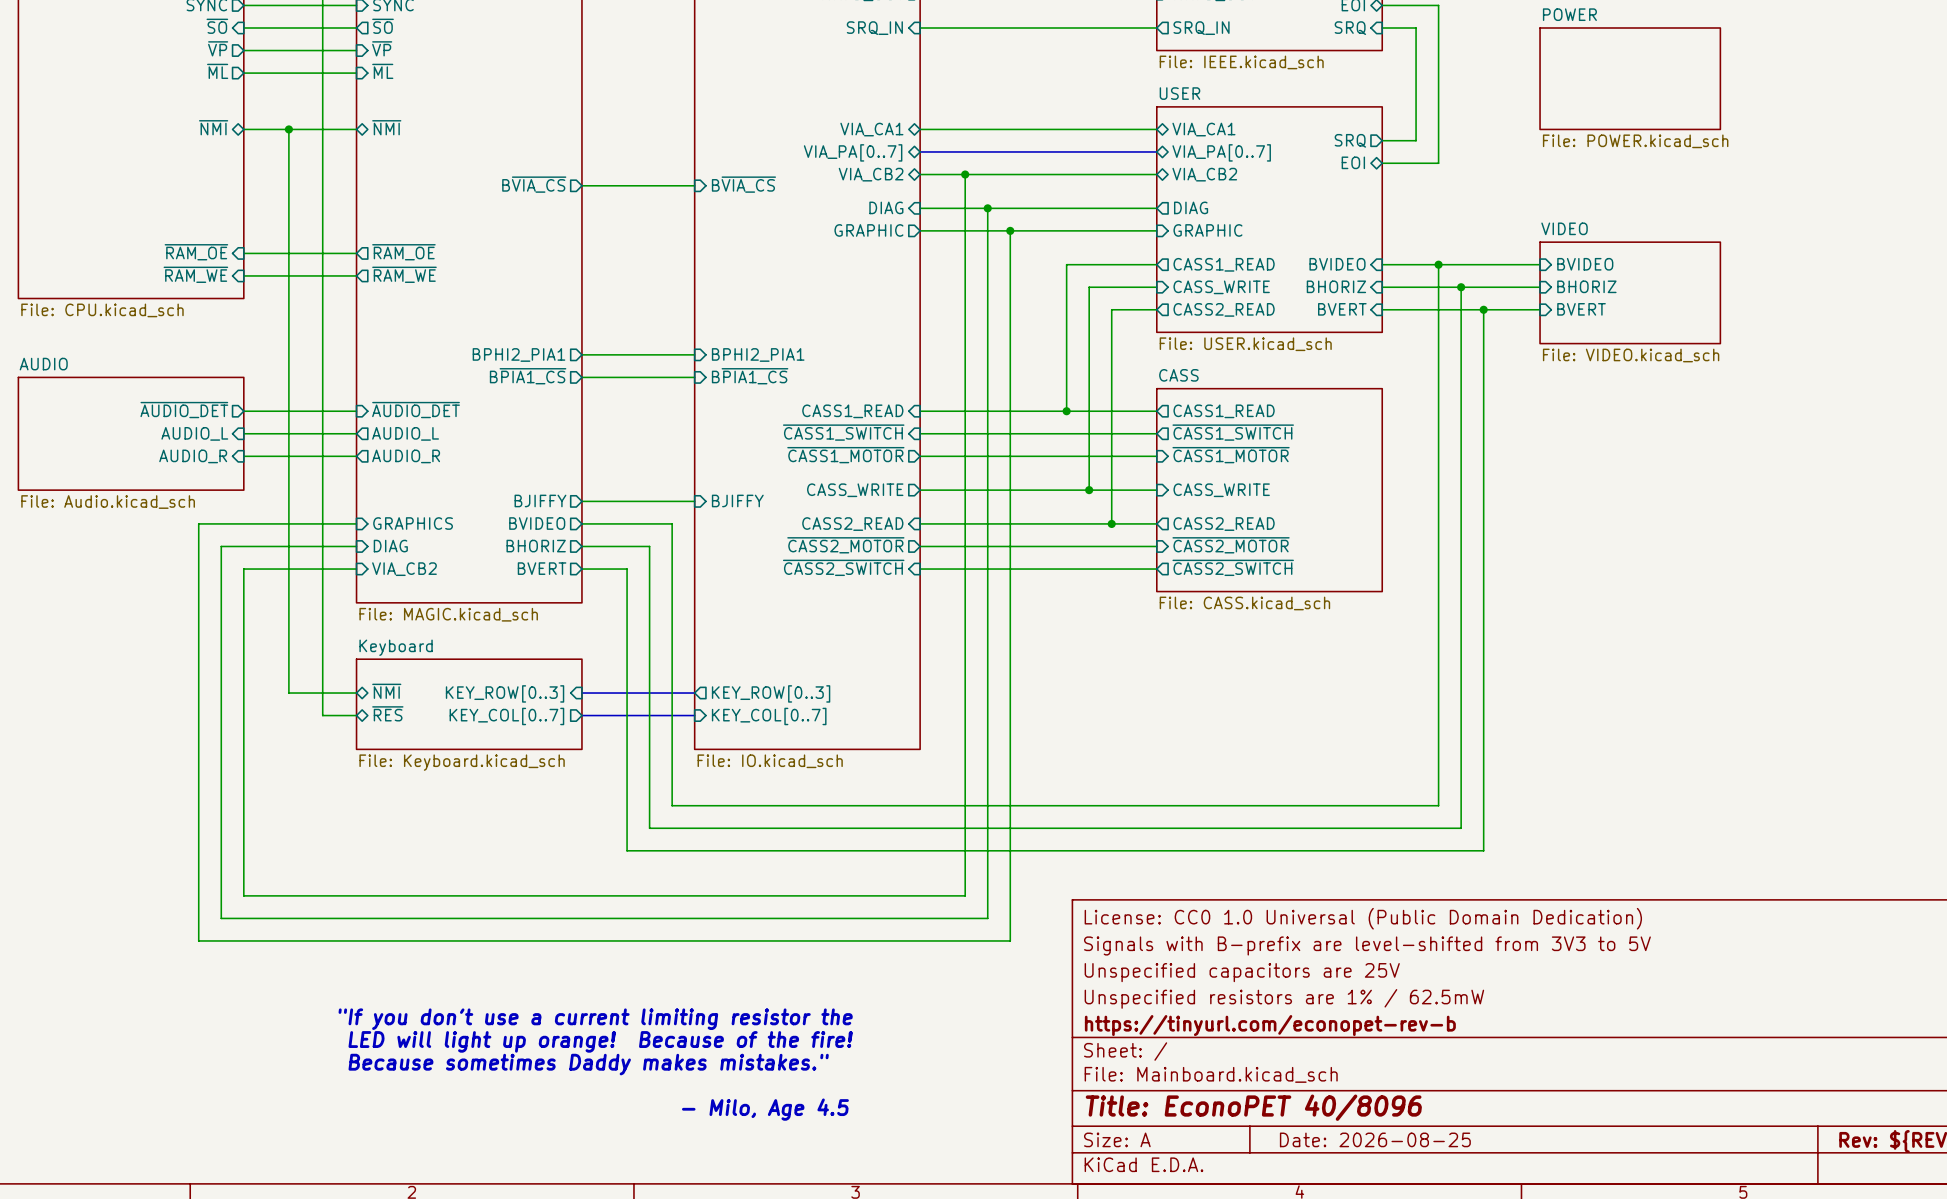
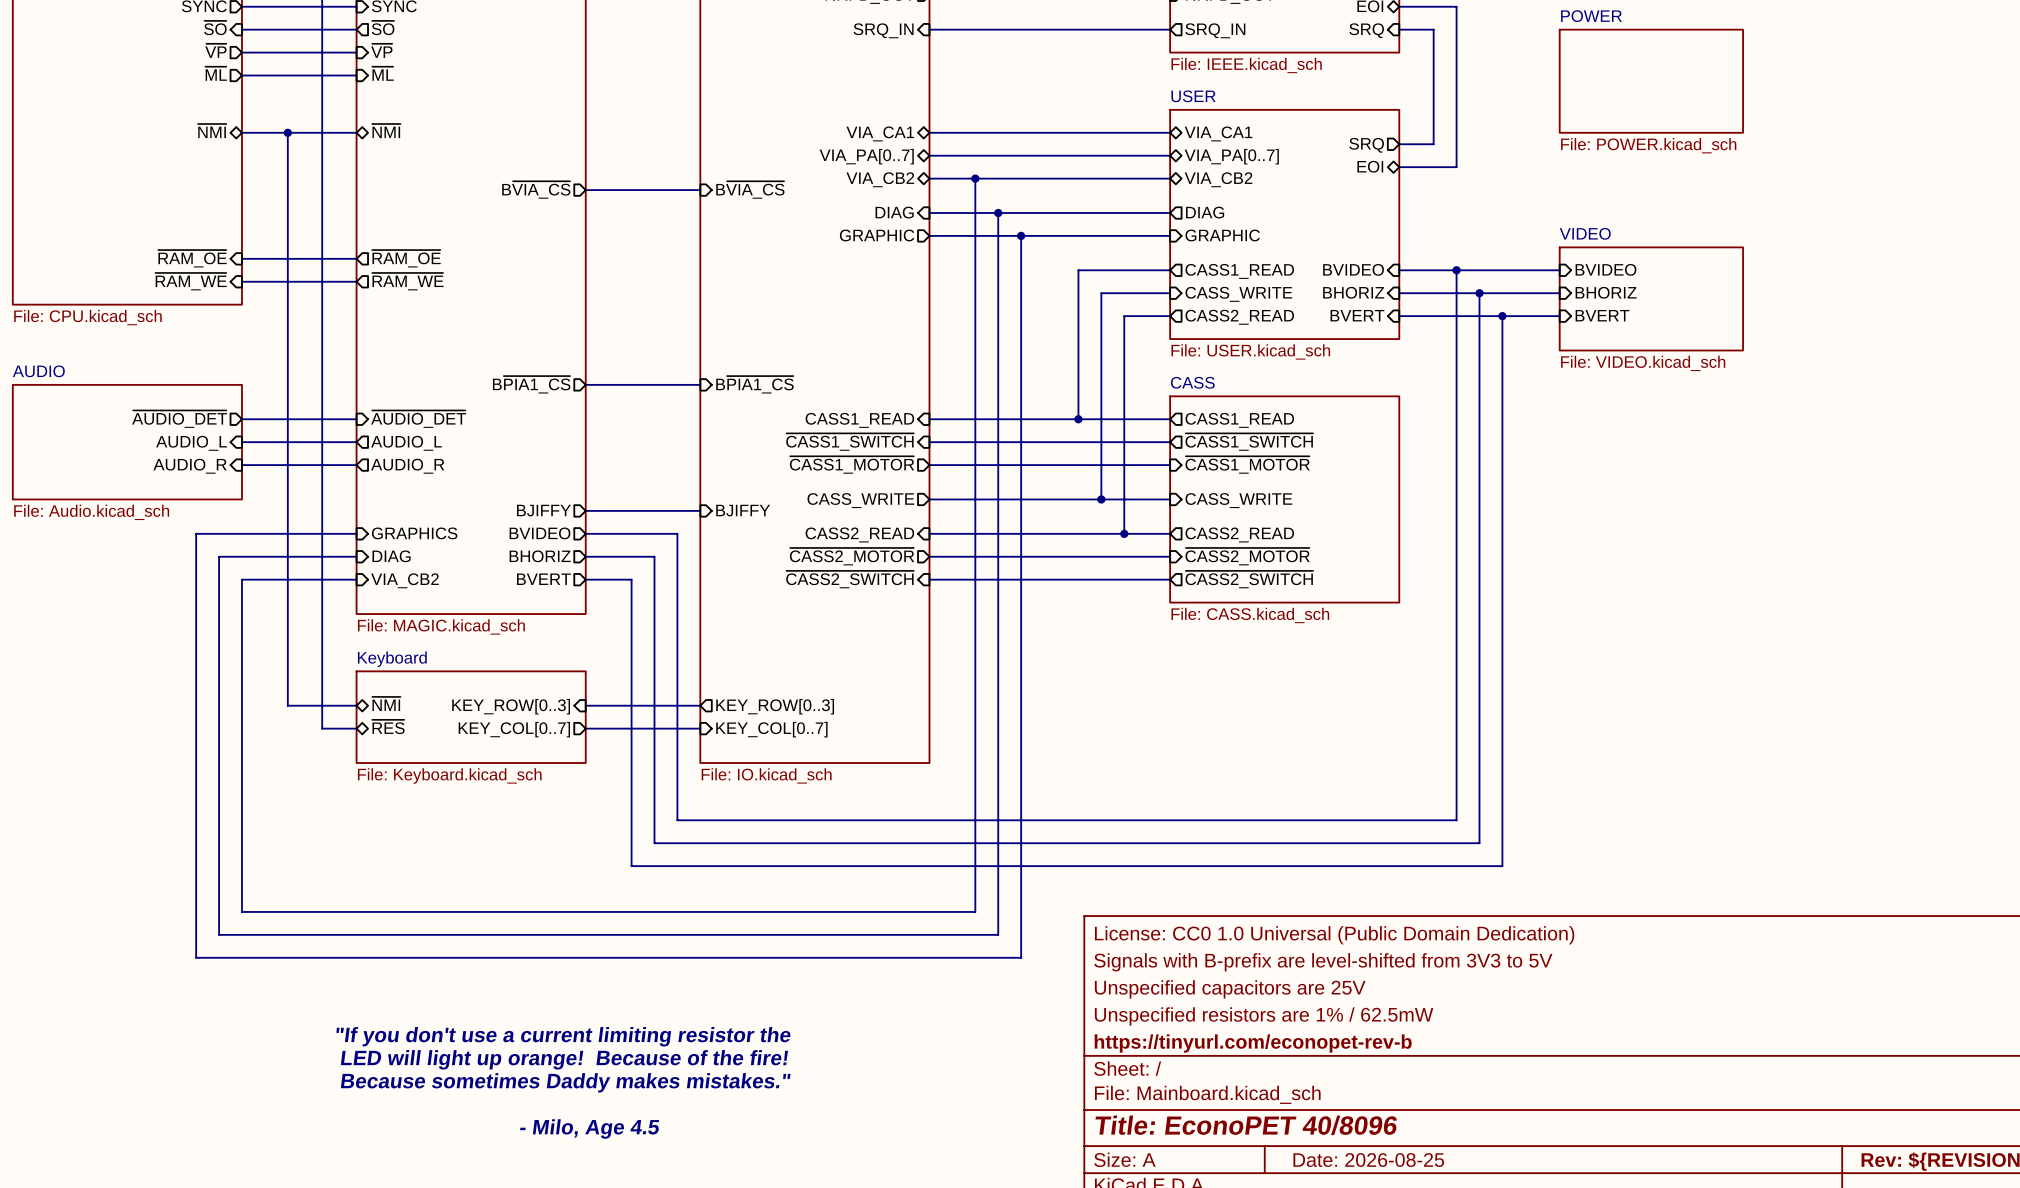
sheet pin: BPHI2_PIA1 (518, 354) -> none
wire: (581, 354) (694, 354) -> none
sheet pin: BPHI2_PIA1 (758, 354) -> none

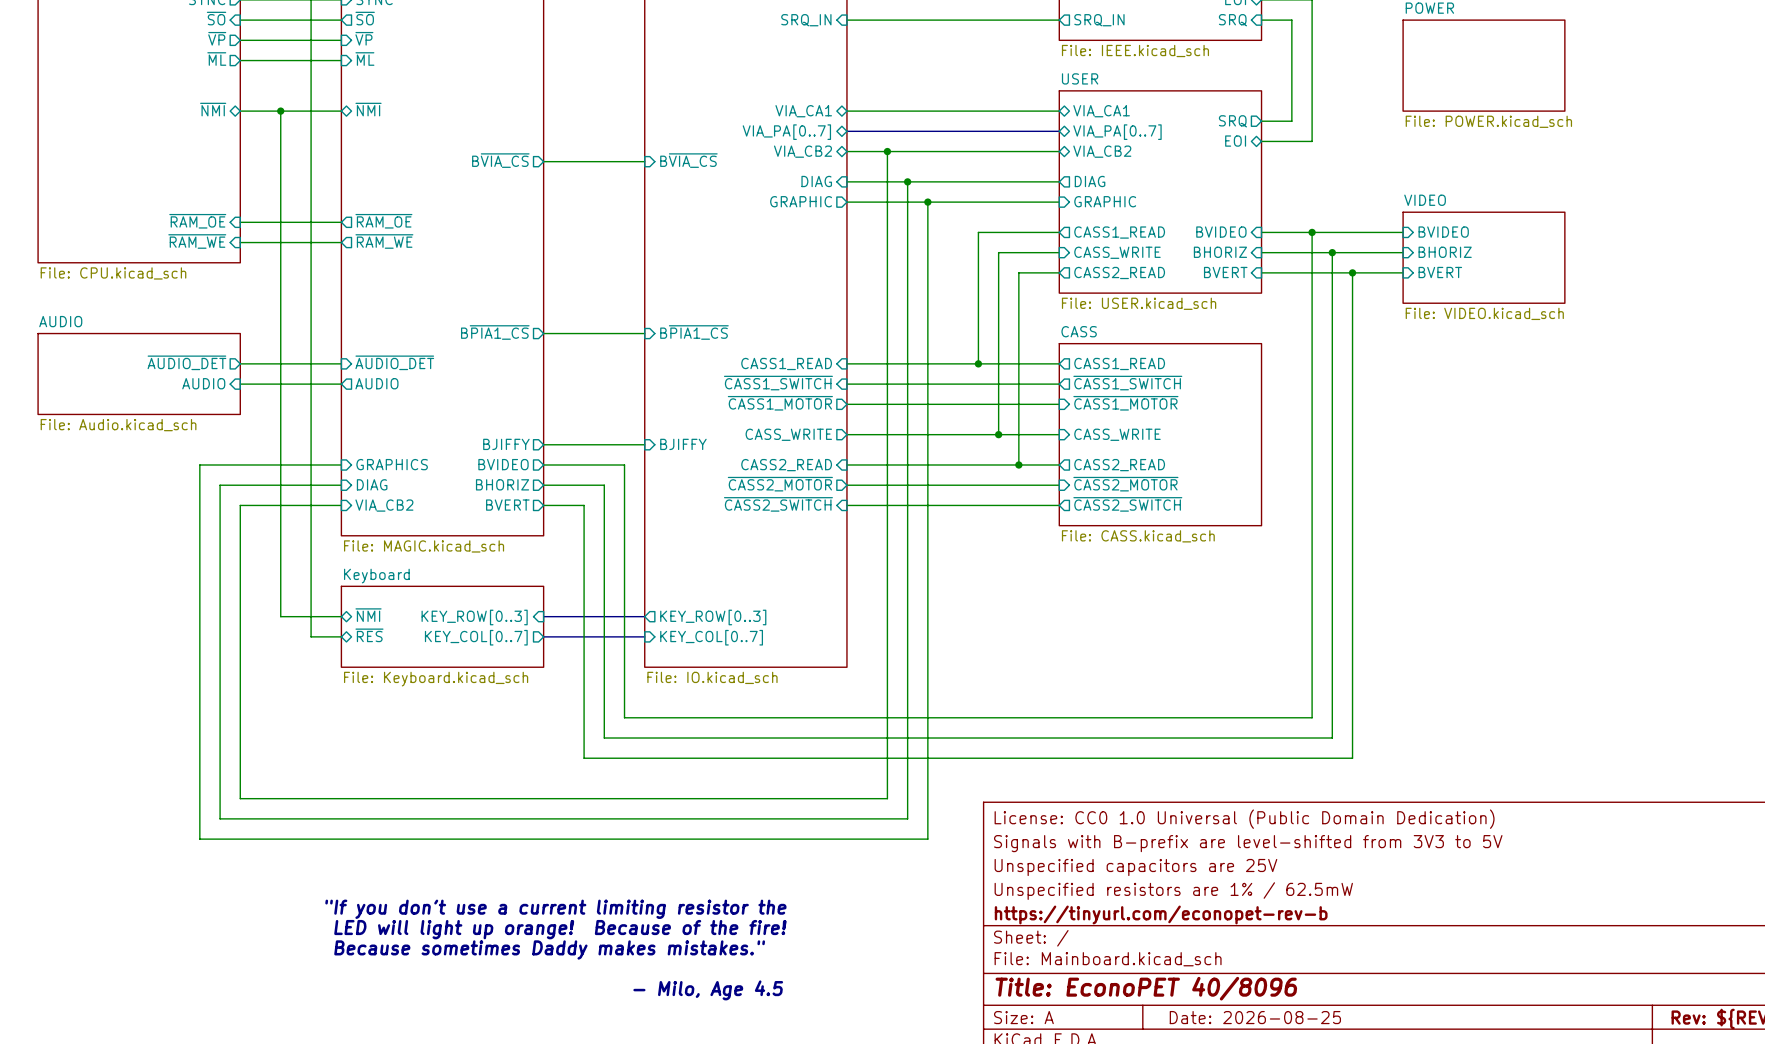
sheet AUDIO: none -> File: Audio.kicad_sch (139, 373)
sheet AUDIO: File: Audio.kicad_sch (127, 442) -> none
sheet pin: AUDIO_L (191, 443) -> AUDIO (203, 383)
sheet pin: AUDIO_L (406, 443) -> AUDIO (376, 383)
wire: (241, 465) (356, 465) -> none
sheet pin: AUDIO_R (190, 466) -> none
sheet pin: AUDIO_R (407, 466) -> none

